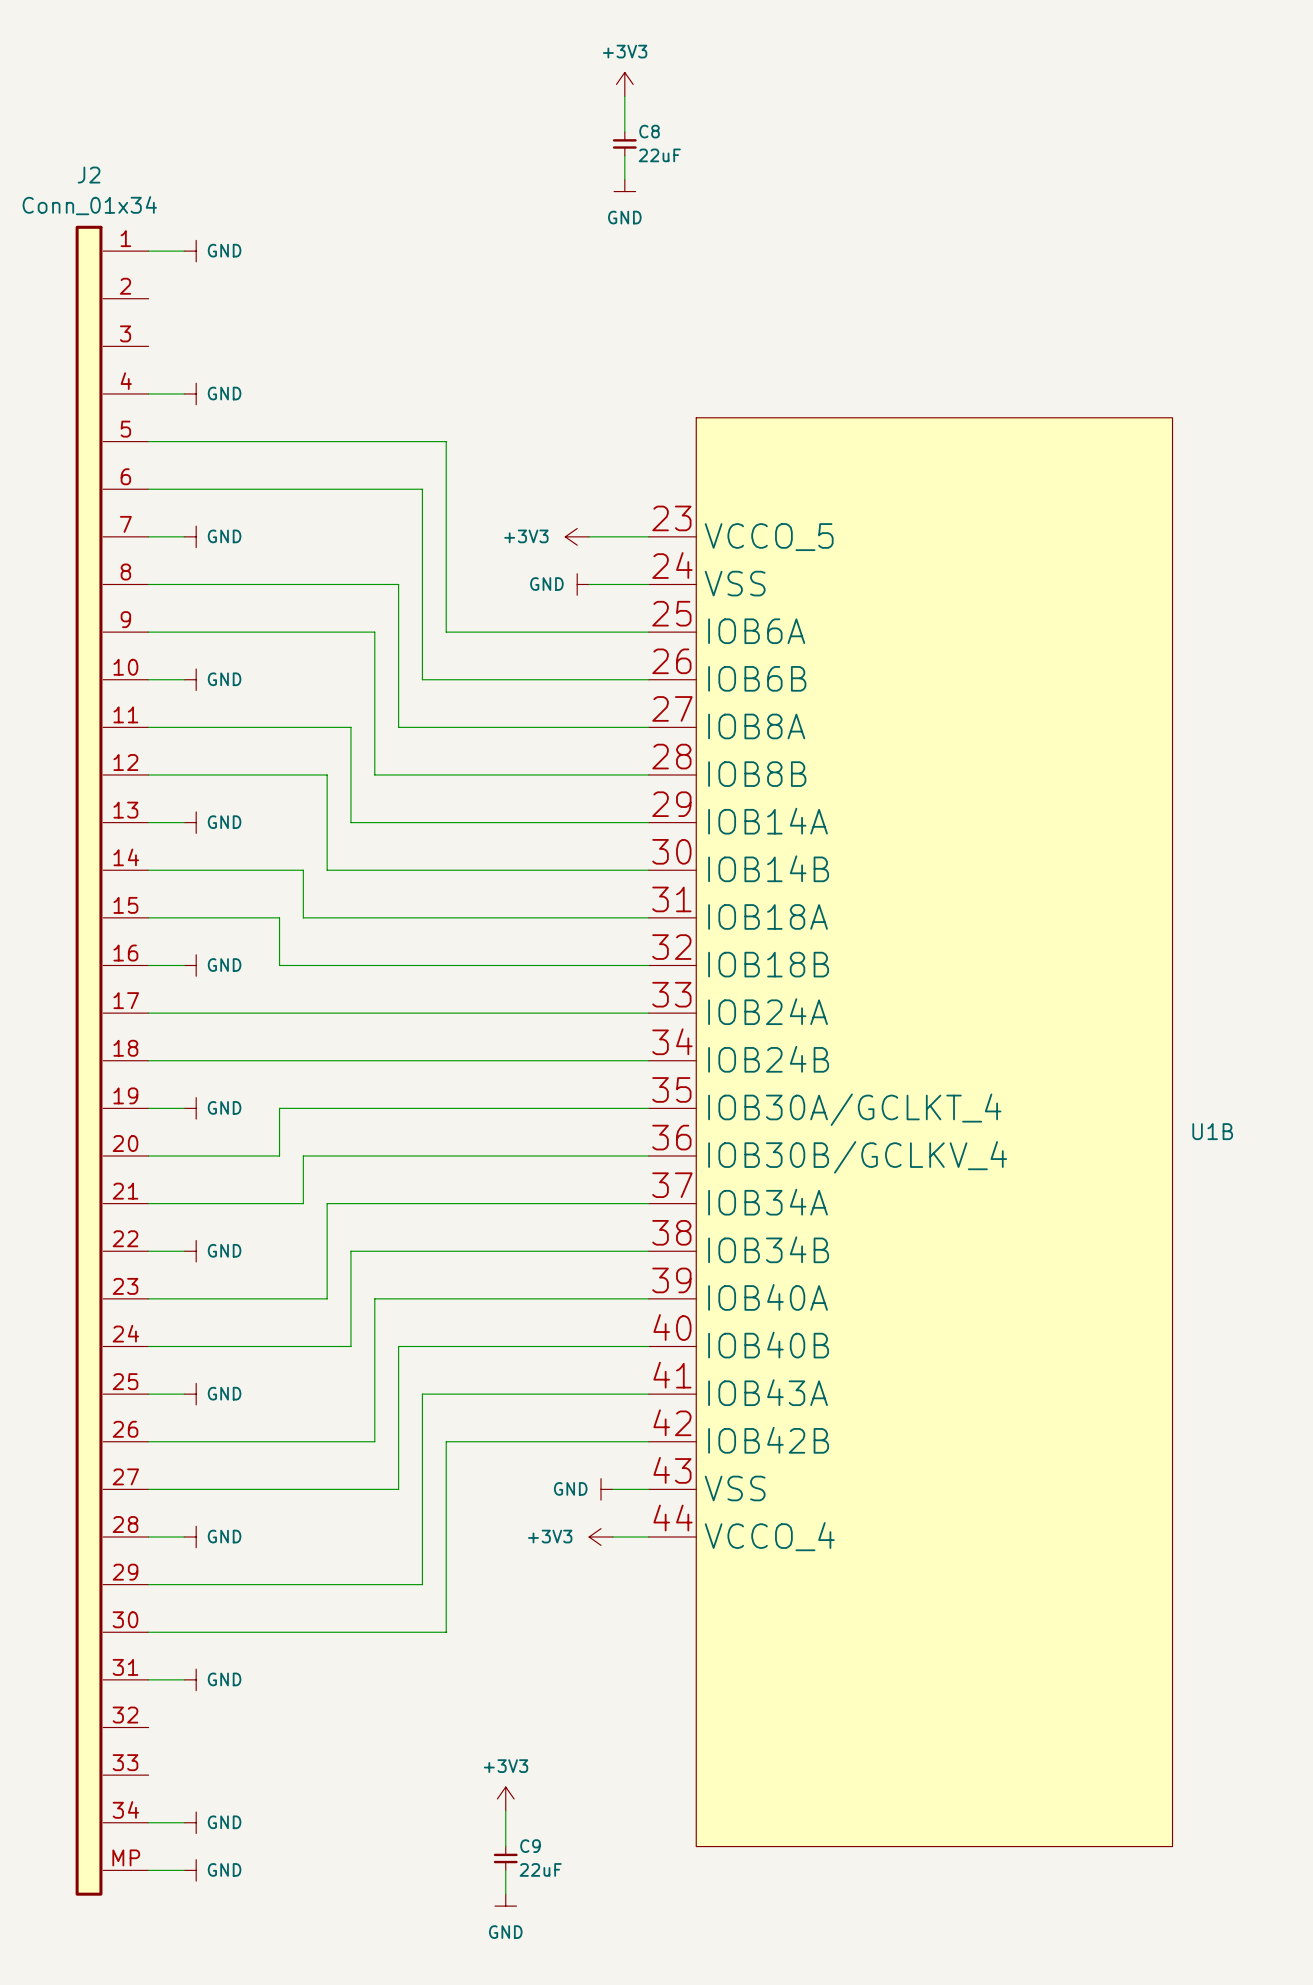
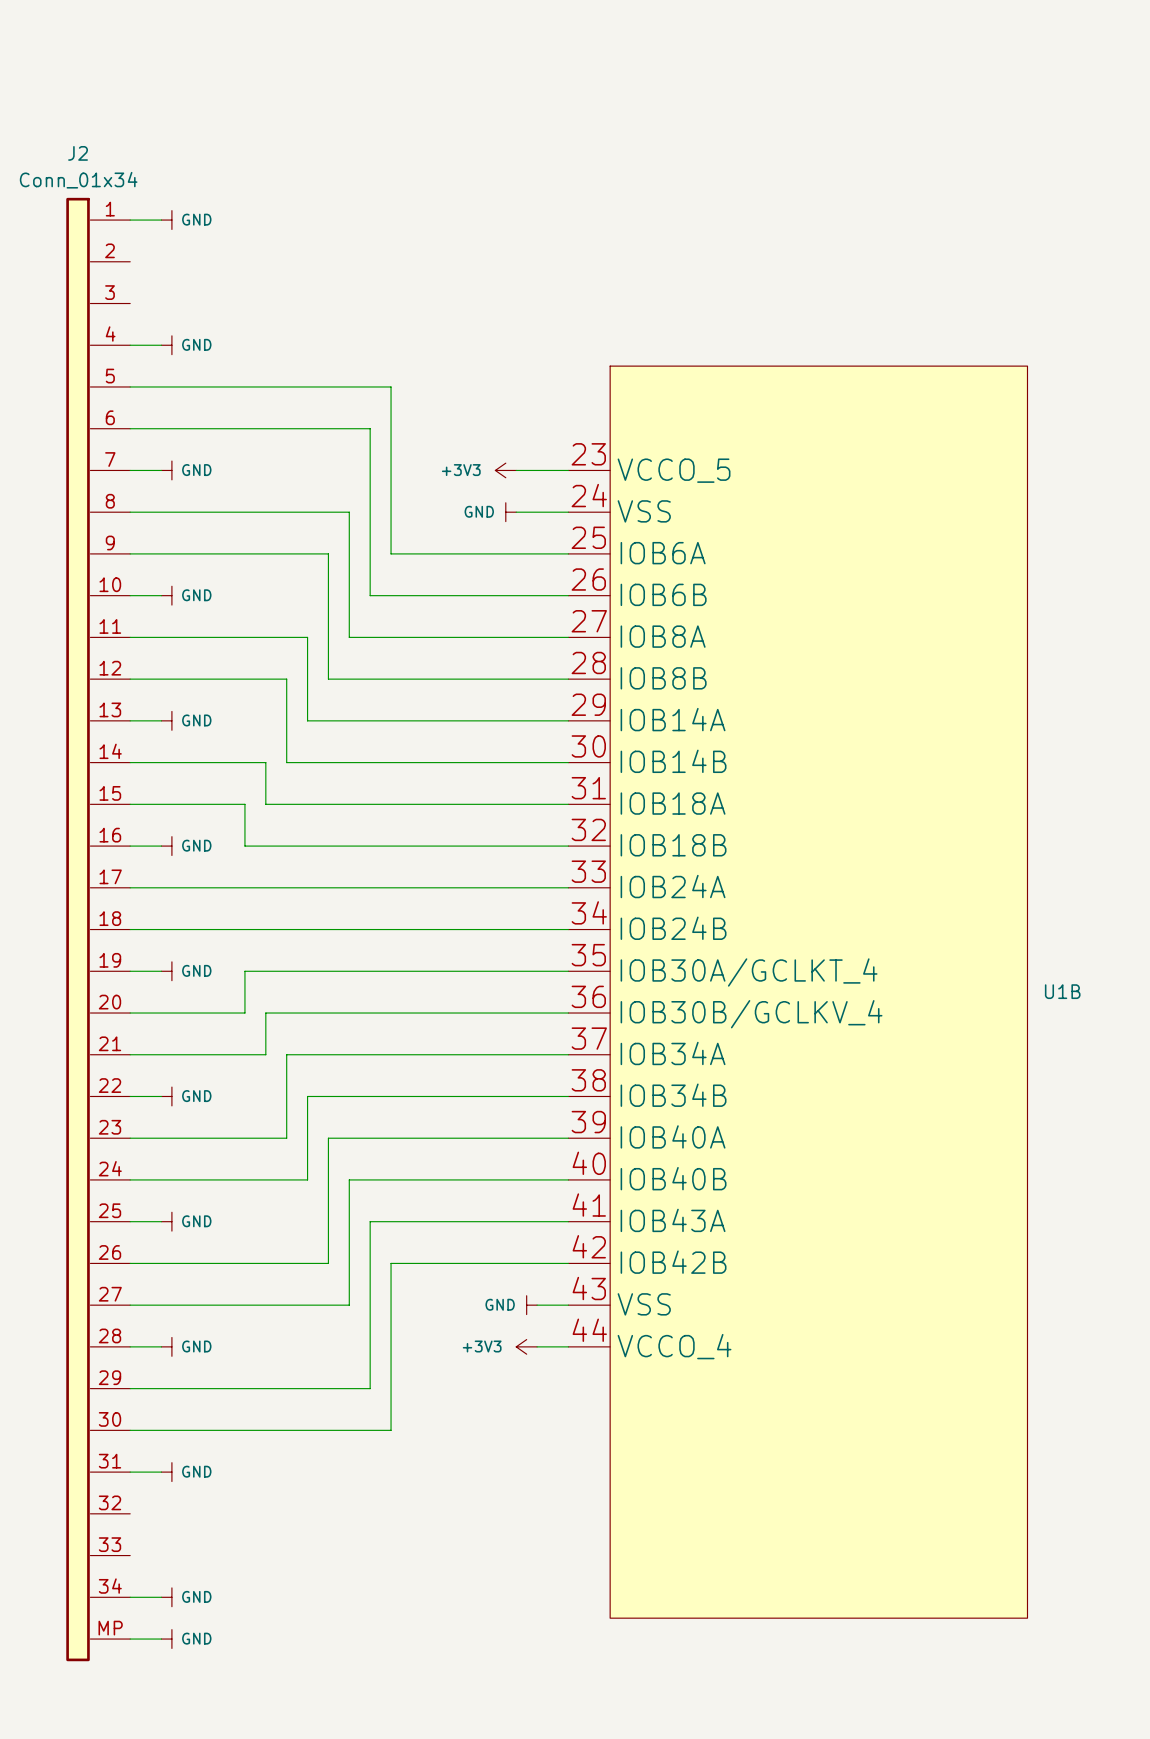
power symbol: +3V3 (624, 84) -> none
wire: (624, 96) (624, 132) -> none
C8: 22uF (624, 143) -> none
wire: (624, 155) (624, 179) -> none
power symbol: GND (624, 185) -> none
power symbol: +3V3 (505, 1798) -> none
wire: (505, 1810) (505, 1846) -> none
C9: 22uF (505, 1858) -> none
wire: (505, 1870) (505, 1894) -> none
power symbol: GND (505, 1900) -> none

